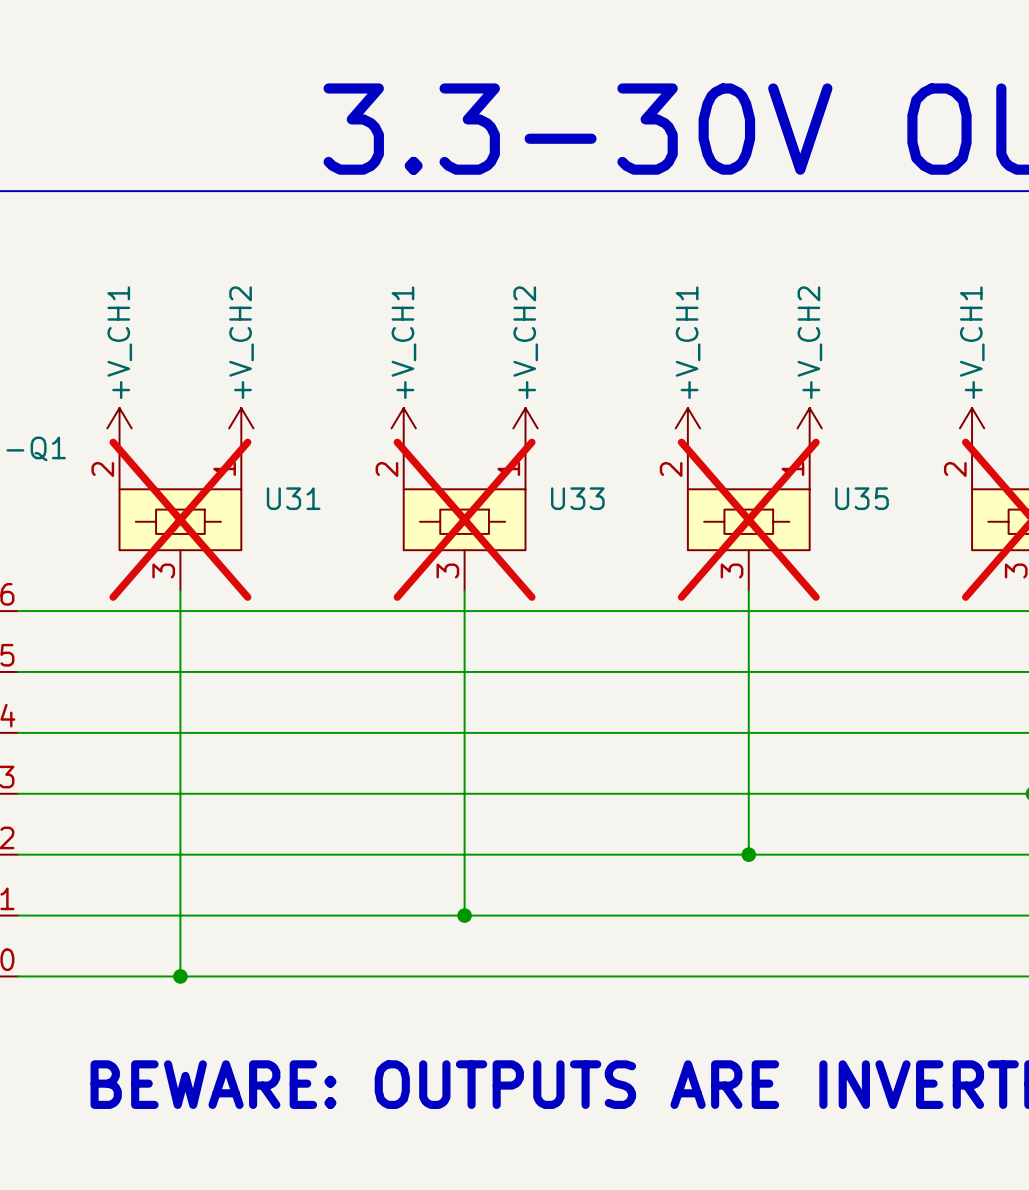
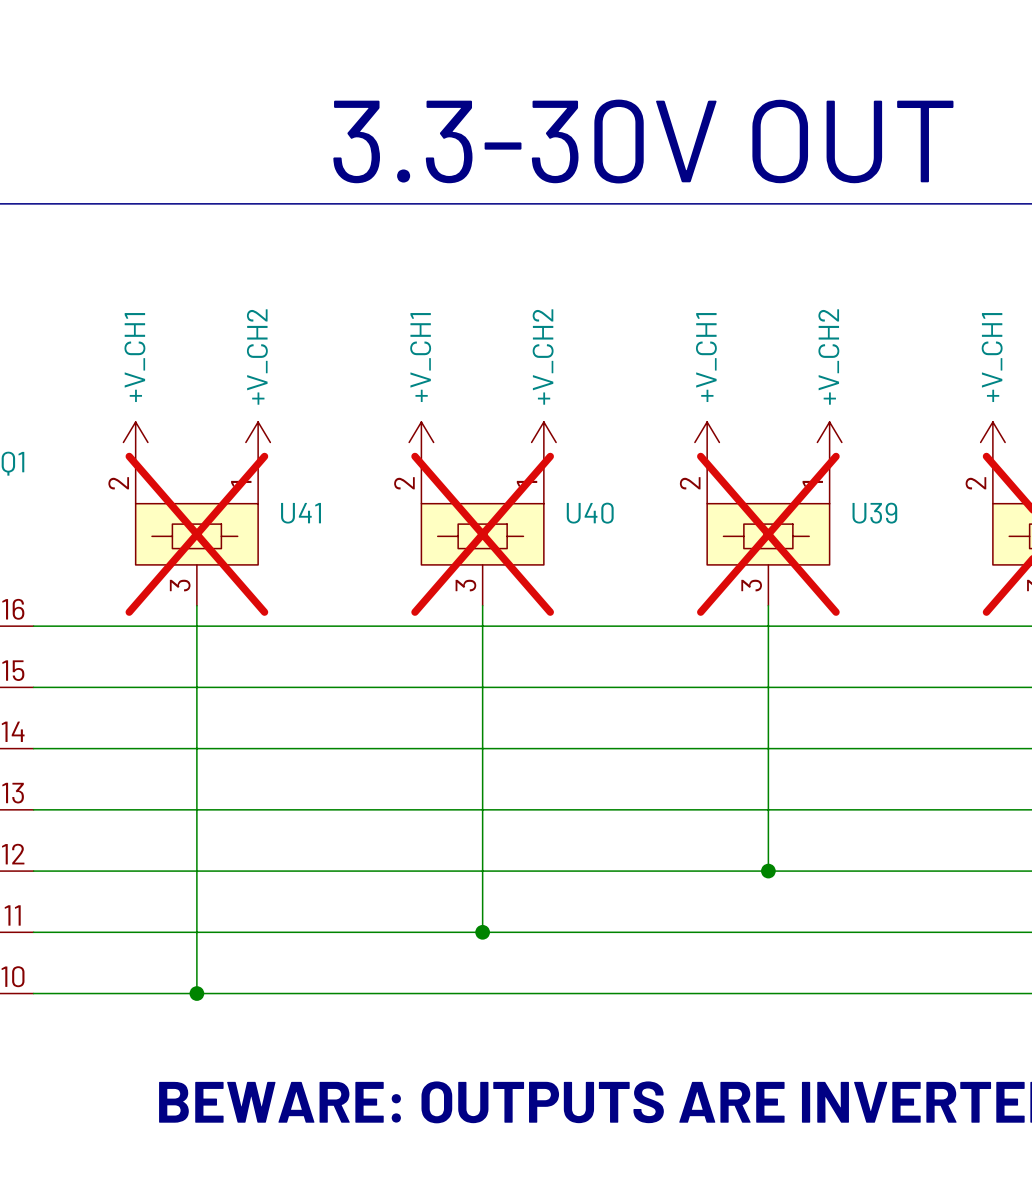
U31 name: U31 (293, 498) -> U41 (301, 513)
U33 name: U33 (577, 498) -> U40 (590, 513)
U35 name: U35 (862, 498) -> U39 (874, 513)

